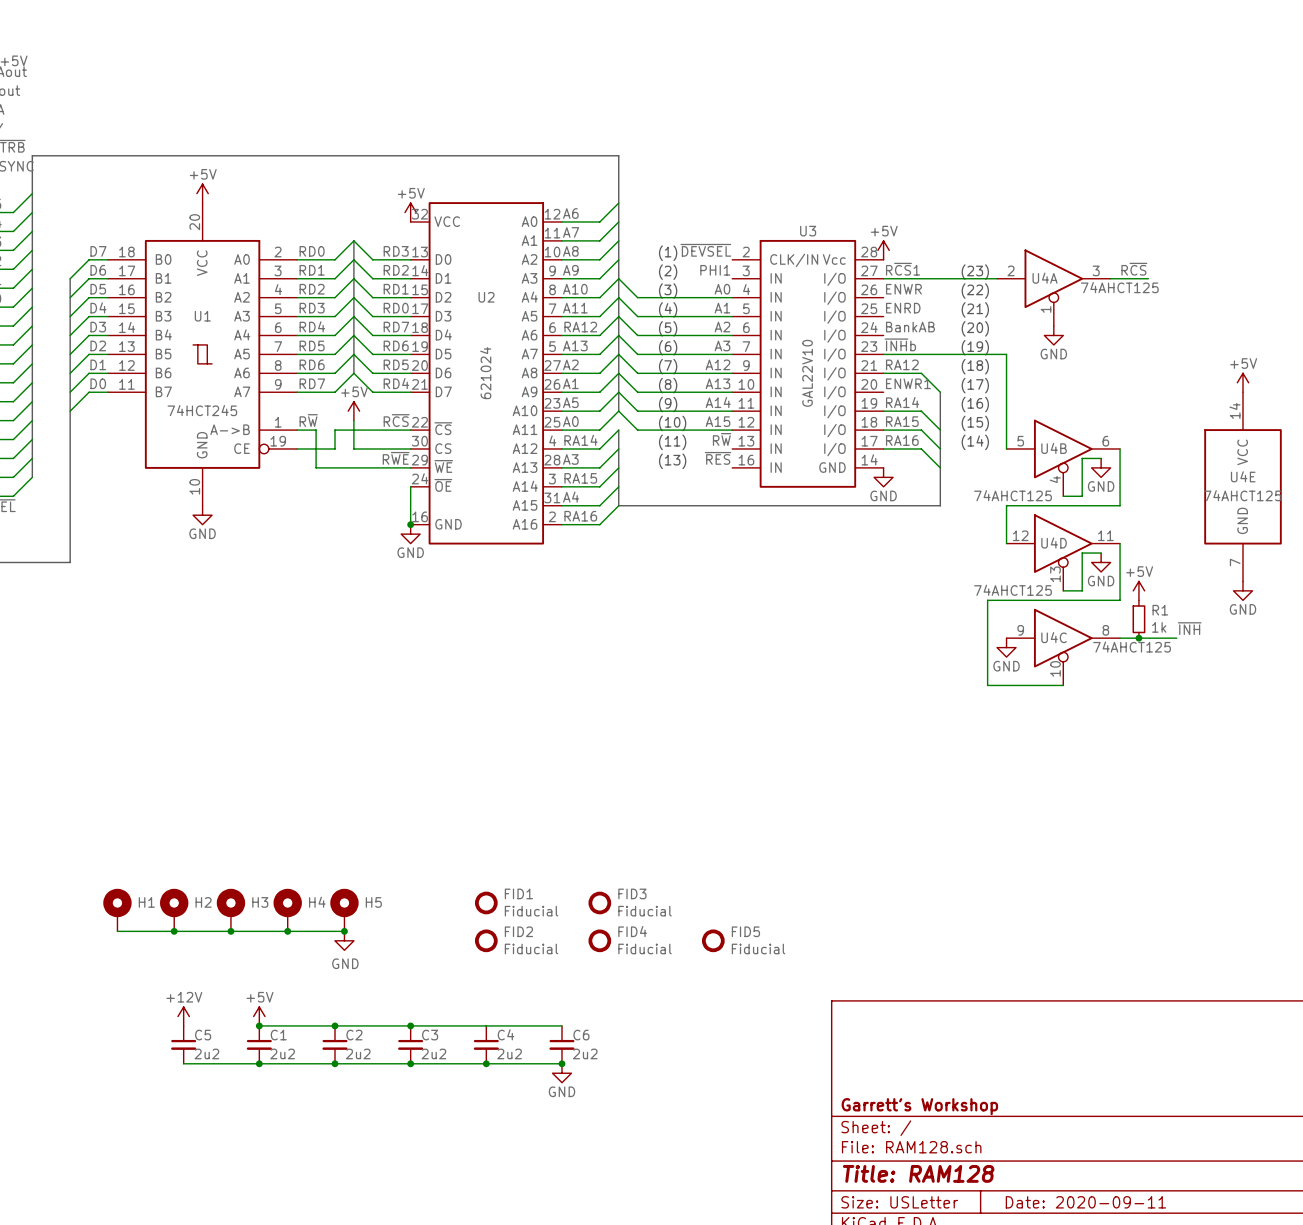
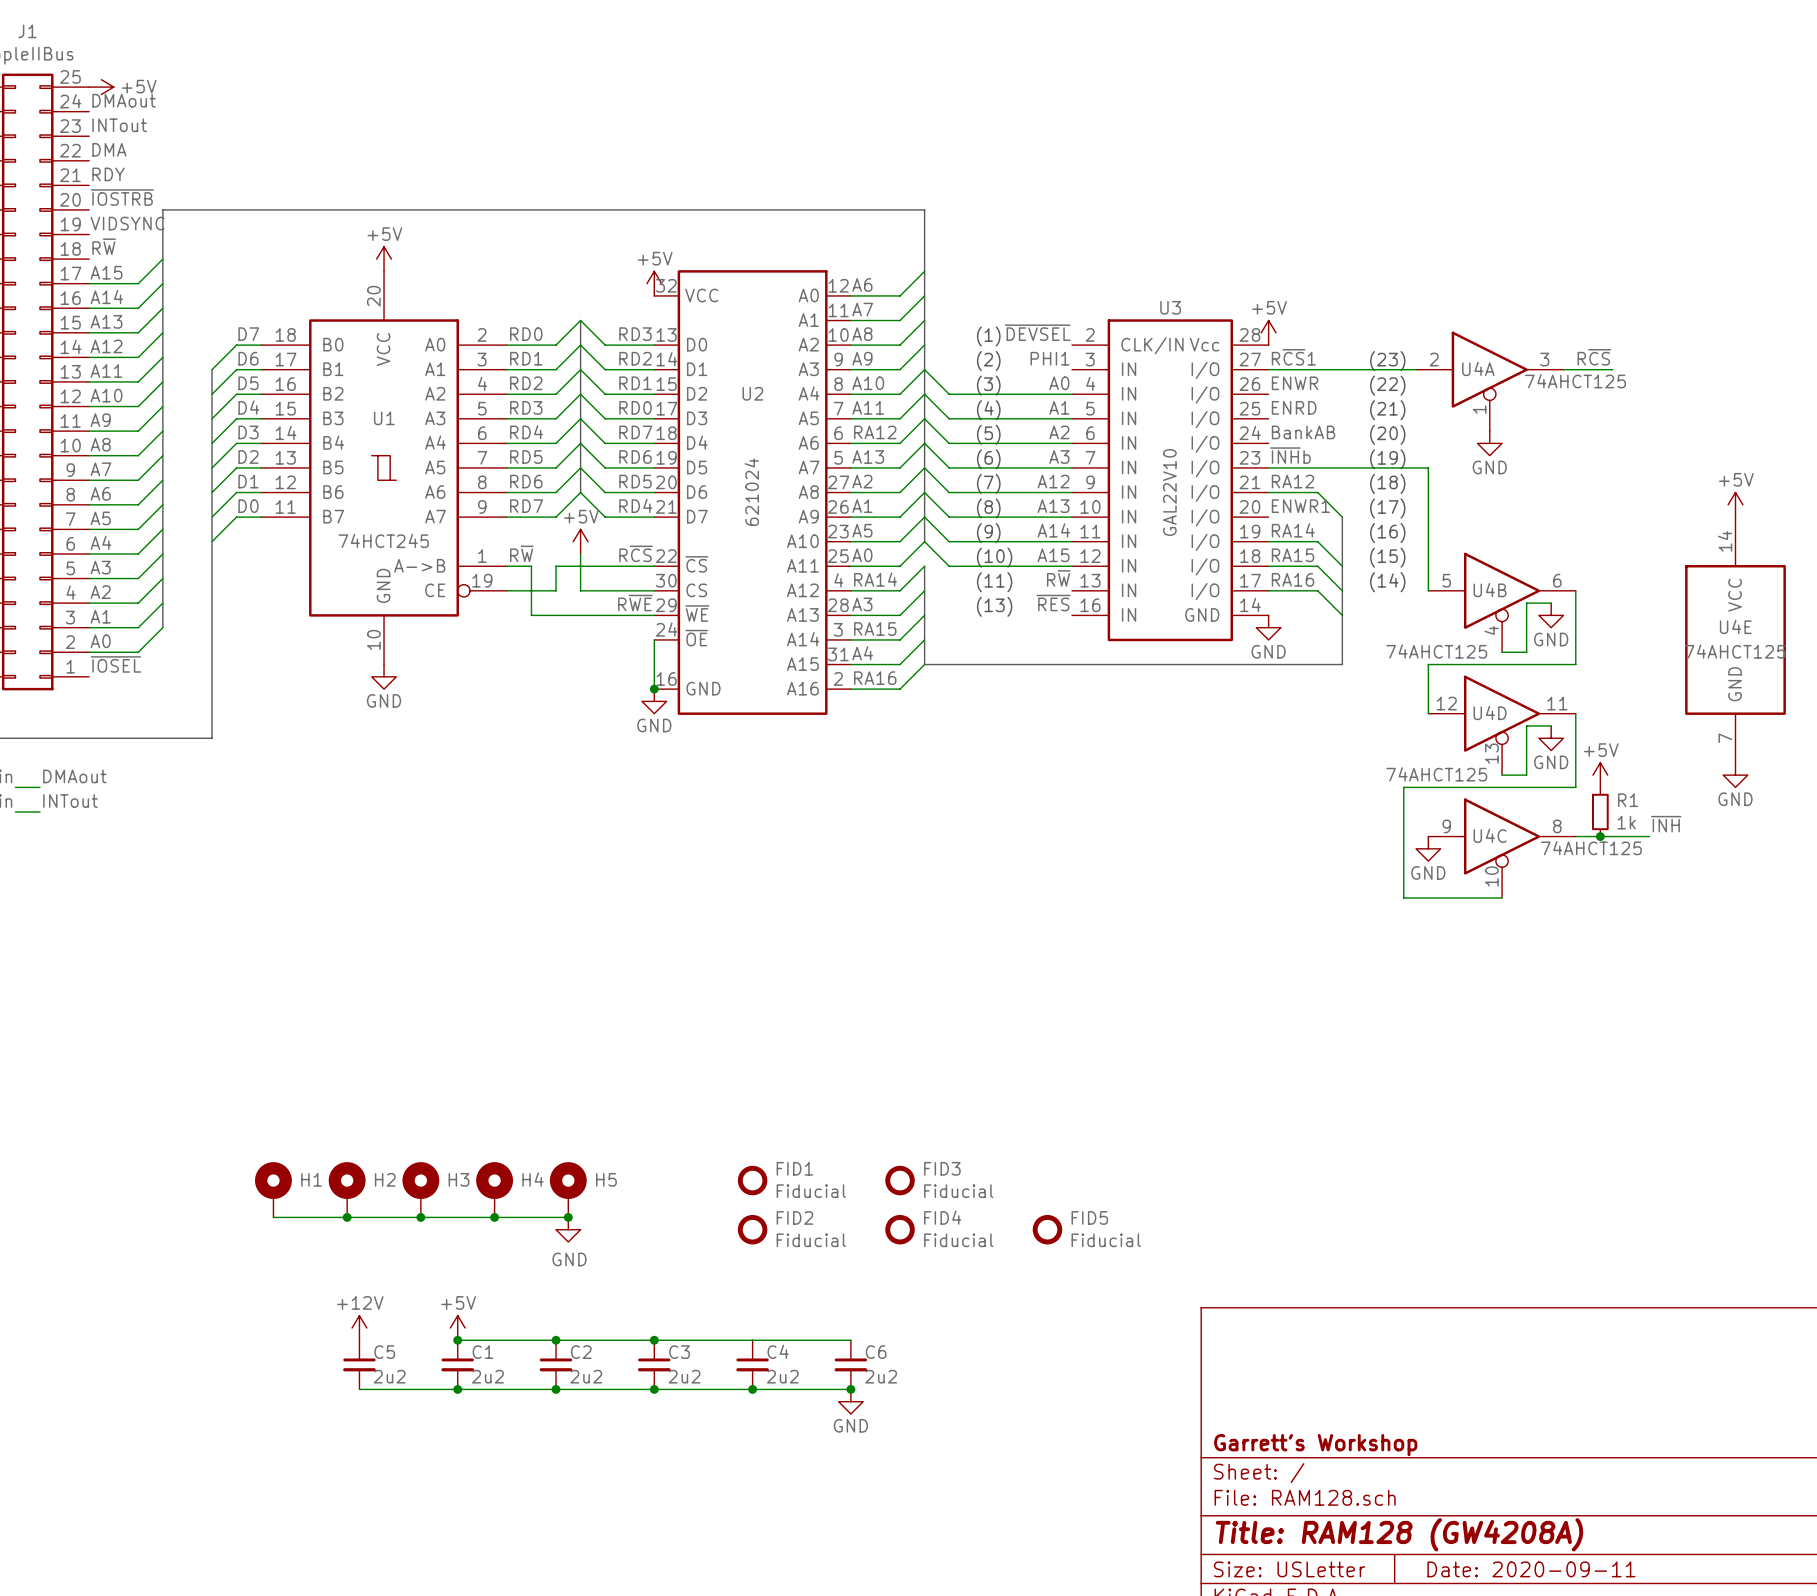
title block: Title: RAM128 (918, 1173) -> Title: RAM128 (GW4208A) (1399, 1534)

